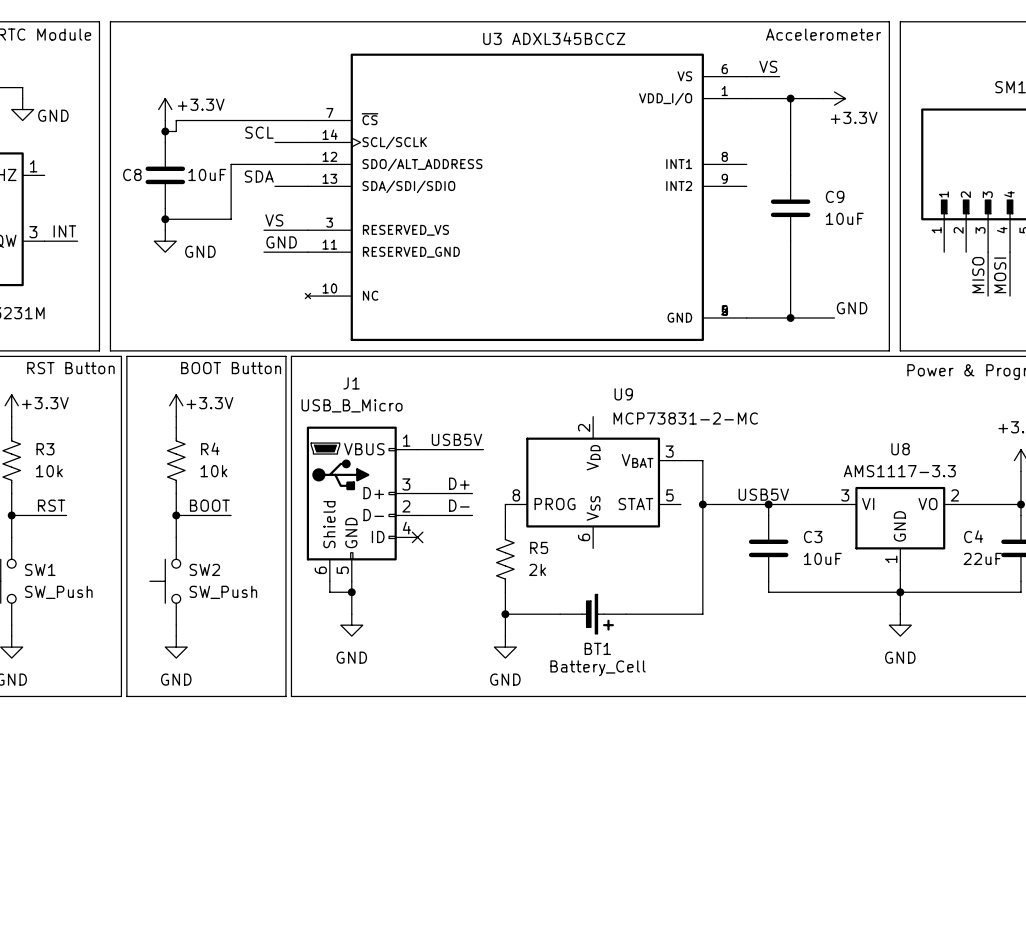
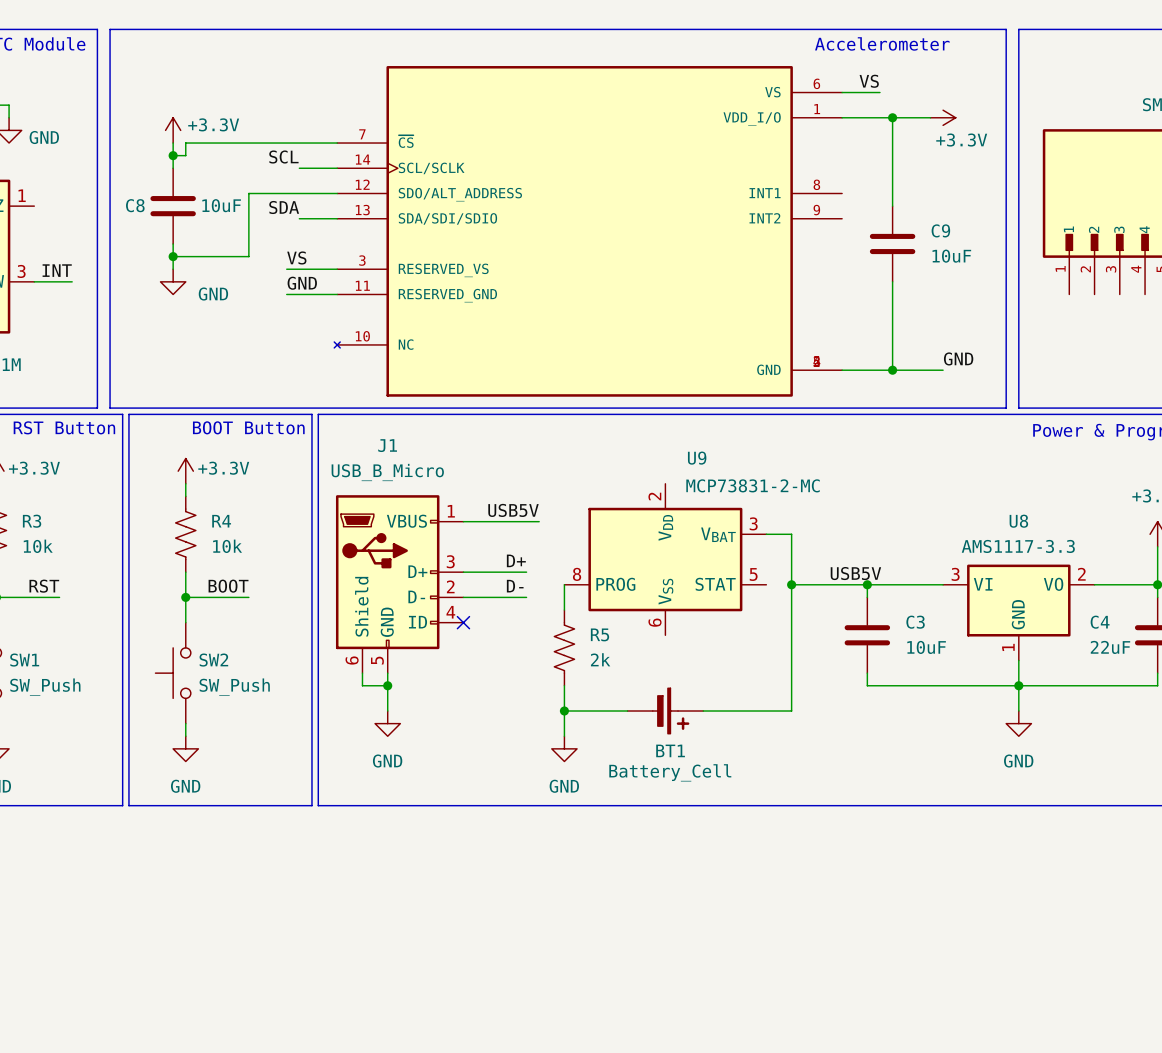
text position: Accelerometer (823, 34) -> Accelerometer (882, 43)
U3 name: U3 (492, 38) -> none
U3 value: ADXL345BCCZ (568, 38) -> none
wire: (988, 252) (988, 296) -> none
wire: (1010, 252) (1010, 296) -> none
label: MISO (978, 275) -> none
label: MOSI (1000, 275) -> none

